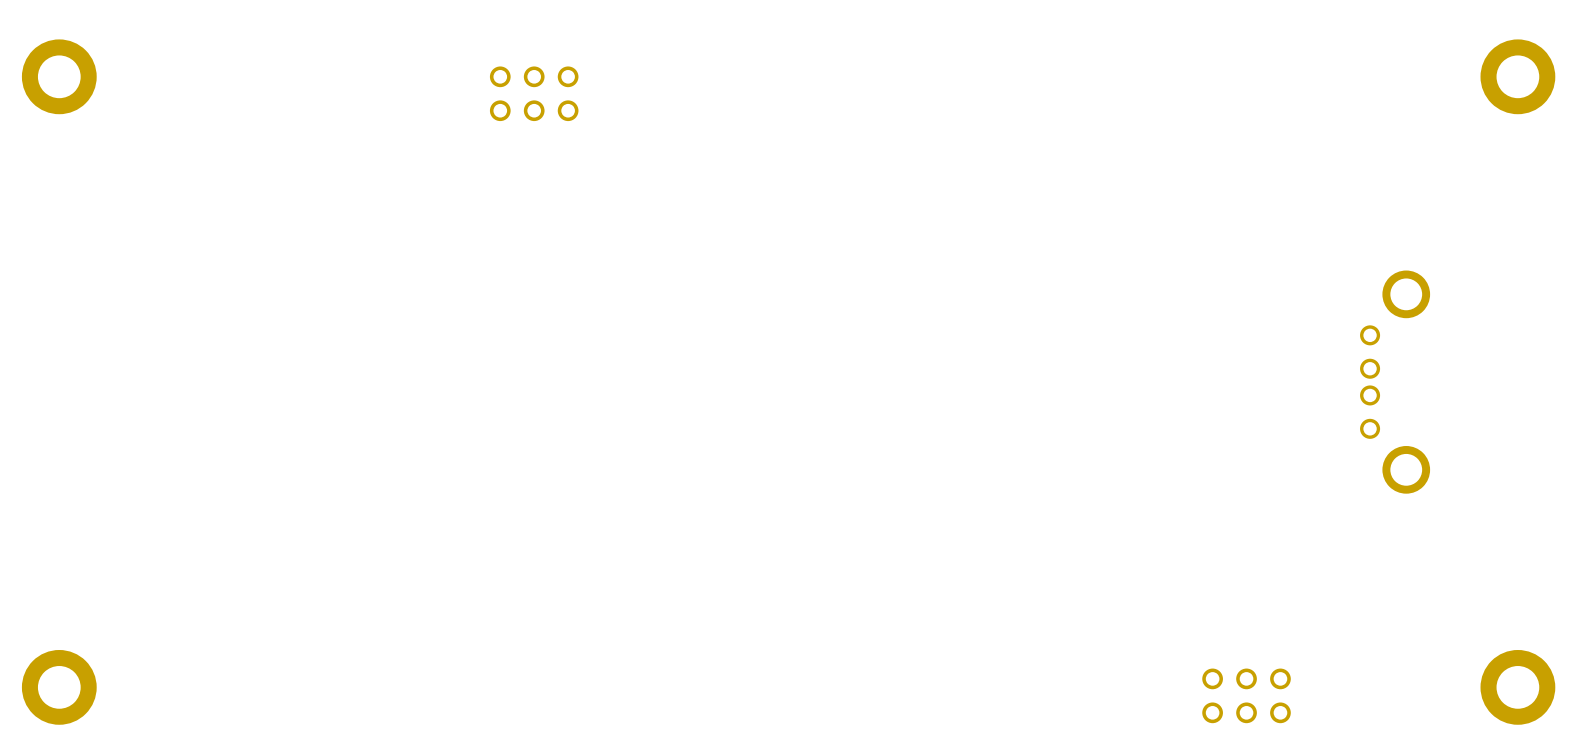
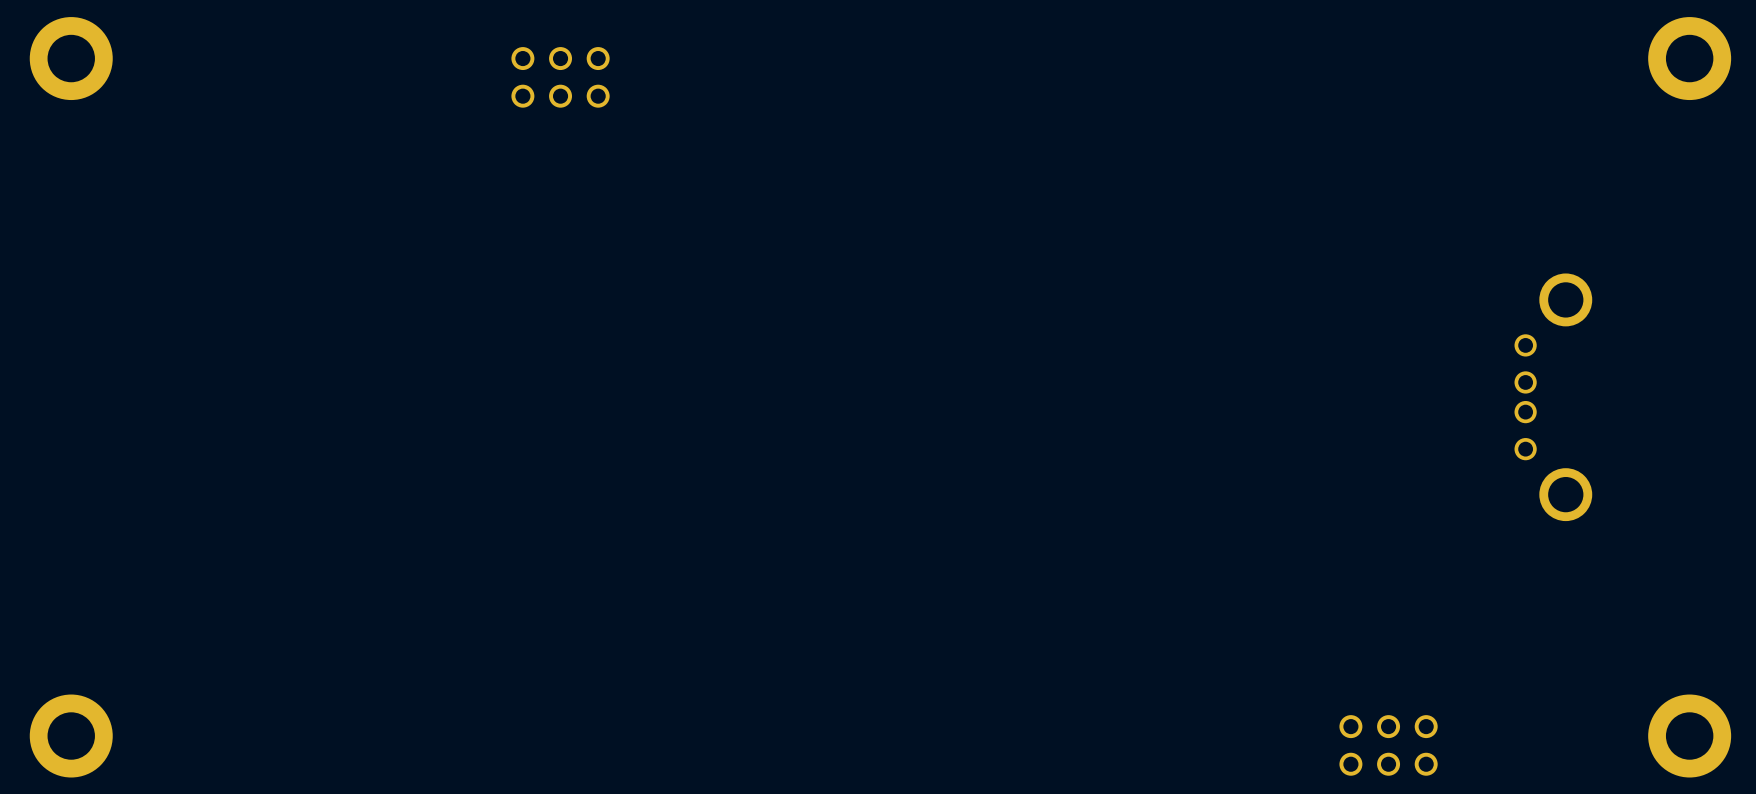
part position: (534, 93) -> (560, 77)

